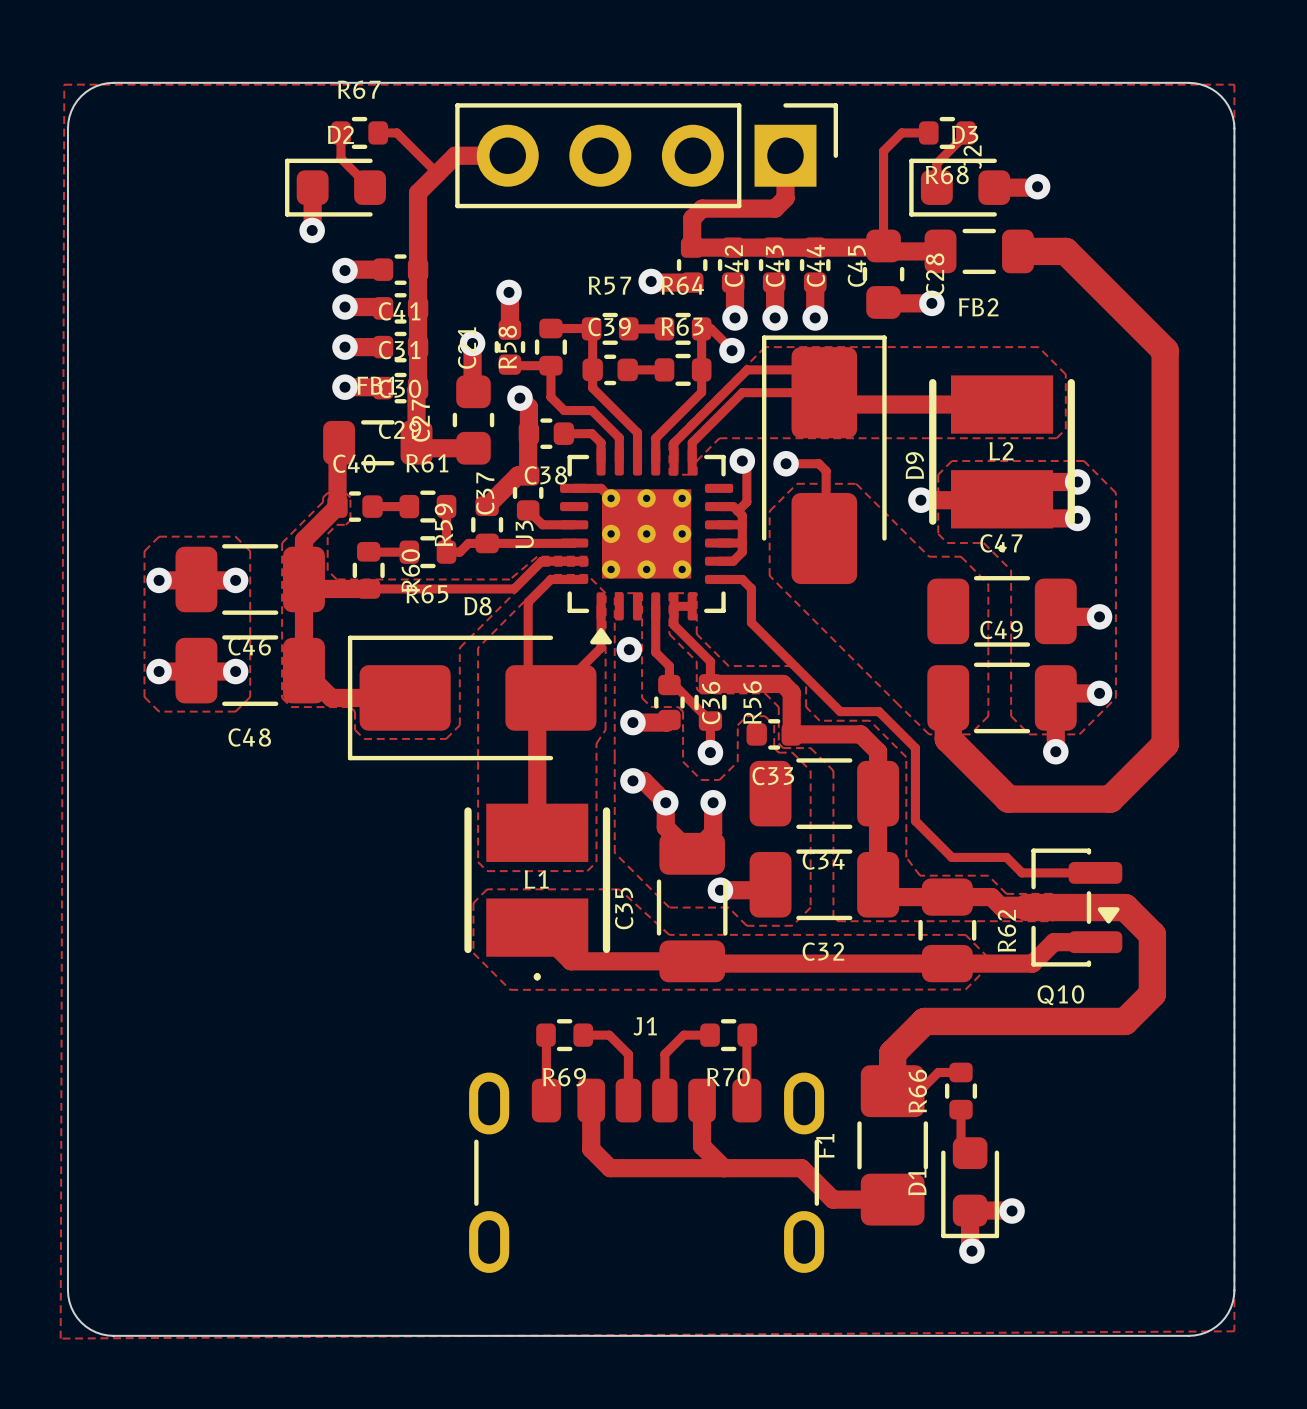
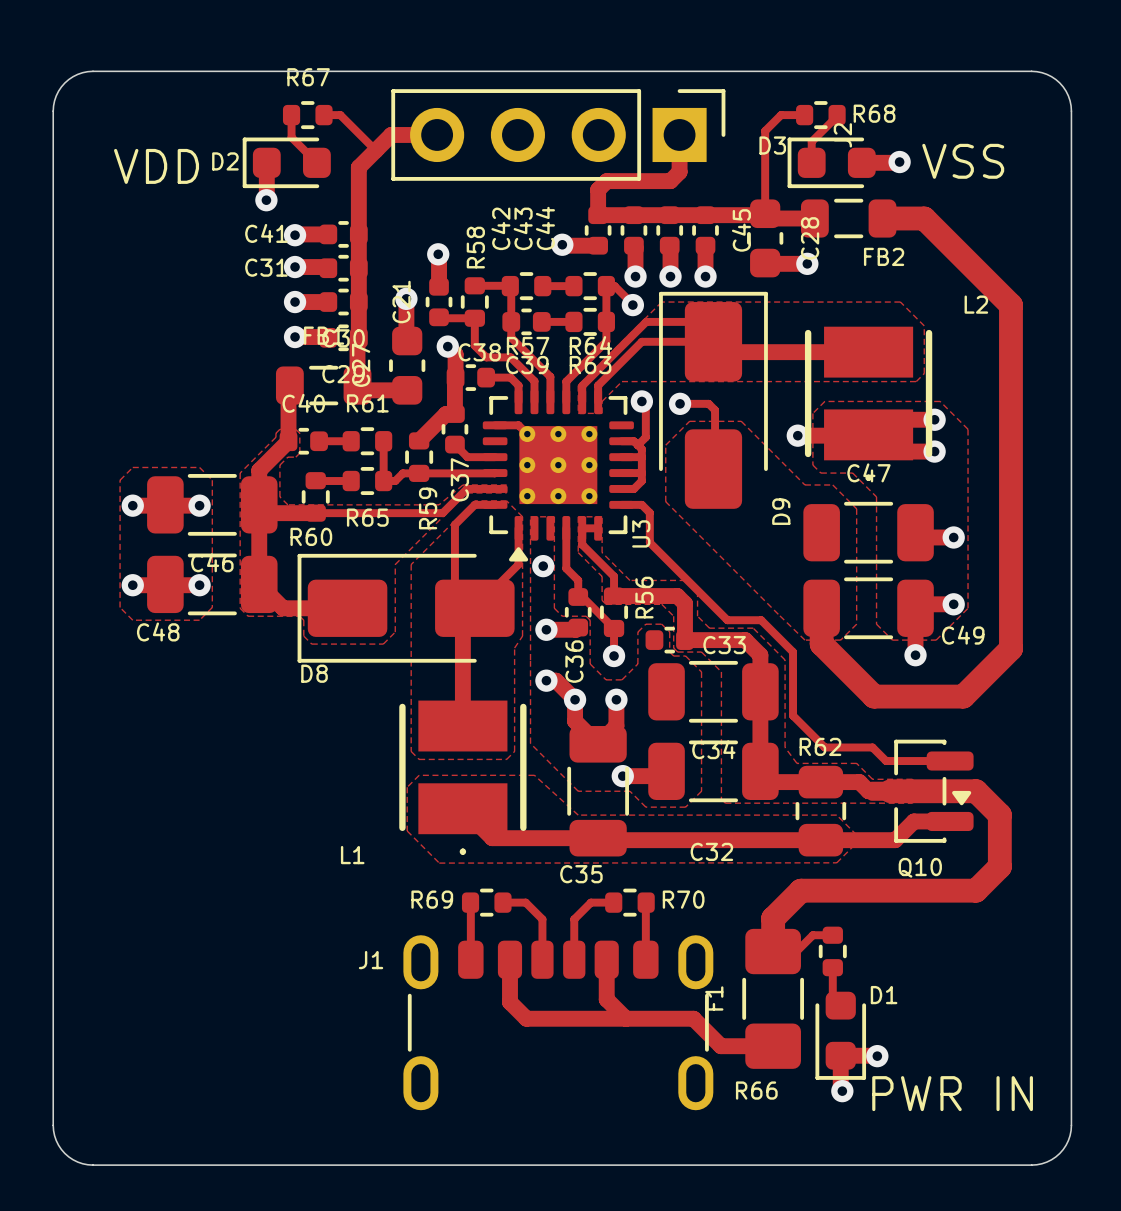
zone outline: (64, 84) (1234, 84) (1234, 1331) (60, 1338) (64, 84) -> none
D2 name position: D2 (340, 134) -> D2 (225, 161)
D3 name position: D3 (965, 134) -> D3 (772, 145)
R68 name position: R68 (947, 175) -> R68 (874, 113)
text: none -> VSS (963, 161)
text: none -> VDD (156, 166)
C44 name position: C44 (815, 265) -> C44 (545, 228)
C42 name position: C42 (733, 266) -> C42 (500, 228)
C43 name position: C43 (774, 266) -> C43 (523, 228)
R57 name position: R57 (609, 285) -> R57 (528, 345)
R64 name position: R64 (682, 285) -> R64 (590, 345)
FB2 name position: FB2 (978, 307) -> FB2 (884, 256)
C41 name position: C41 (399, 311) -> C41 (266, 233)
R63 name position: R63 (682, 326) -> R63 (590, 365)
C39 name position: C39 (609, 327) -> C39 (527, 365)
R58 name position: R58 (507, 347) -> R58 (475, 247)
C31 name position: C31 (399, 350) -> C31 (266, 267)
L2 name position: L2 (1001, 451) -> L2 (976, 304)
D9 name position: D9 (914, 465) -> D9 (781, 511)
C38 name position: C38 (545, 475) -> C38 (479, 352)
C37 name position: C37 (485, 493) -> C37 (459, 479)
R59 name position: R59 (443, 524) -> R59 (428, 508)
U3 name position: U3 (524, 534) -> U3 (641, 533)
R60 name rotation: 0° (410, 570) -> 90° clockwise (311, 536)
R60 name position: R60 (410, 570) -> R60 (311, 536)
D8 name position: D8 (478, 606) -> D8 (314, 673)
C49 name position: C49 (1001, 629) -> C49 (963, 635)
R56 name position: R56 (752, 702) -> R56 (644, 597)
C36 name position: C36 (711, 703) -> C36 (574, 661)
C48 name position: C48 (249, 737) -> C48 (158, 631)
C33 name position: C33 (773, 776) -> C33 (724, 645)
L1 name position: L1 (536, 879) -> L1 (352, 855)
C35 name rotation: 0° (624, 908) -> 90° clockwise (581, 874)
C35 name position: C35 (624, 908) -> C35 (581, 874)
R62 name rotation: 0° (1006, 930) -> 90° clockwise (820, 746)
R62 name position: R62 (1006, 930) -> R62 (820, 746)
C32 name position: C32 (823, 951) -> C32 (711, 851)
J1 name position: J1 (645, 1026) -> J1 (371, 960)
R69 name position: R69 (564, 1077) -> R69 (432, 899)
R70 name position: R70 (728, 1077) -> R70 (683, 899)
R66 name rotation: 0° (917, 1091) -> 90° clockwise (756, 1090)
R66 name position: R66 (917, 1091) -> R66 (756, 1090)
D1 name rotation: 0° (917, 1182) -> 90° clockwise (884, 995)
D1 name position: D1 (917, 1182) -> D1 (884, 995)
text: none -> PWR IN (952, 1093)

